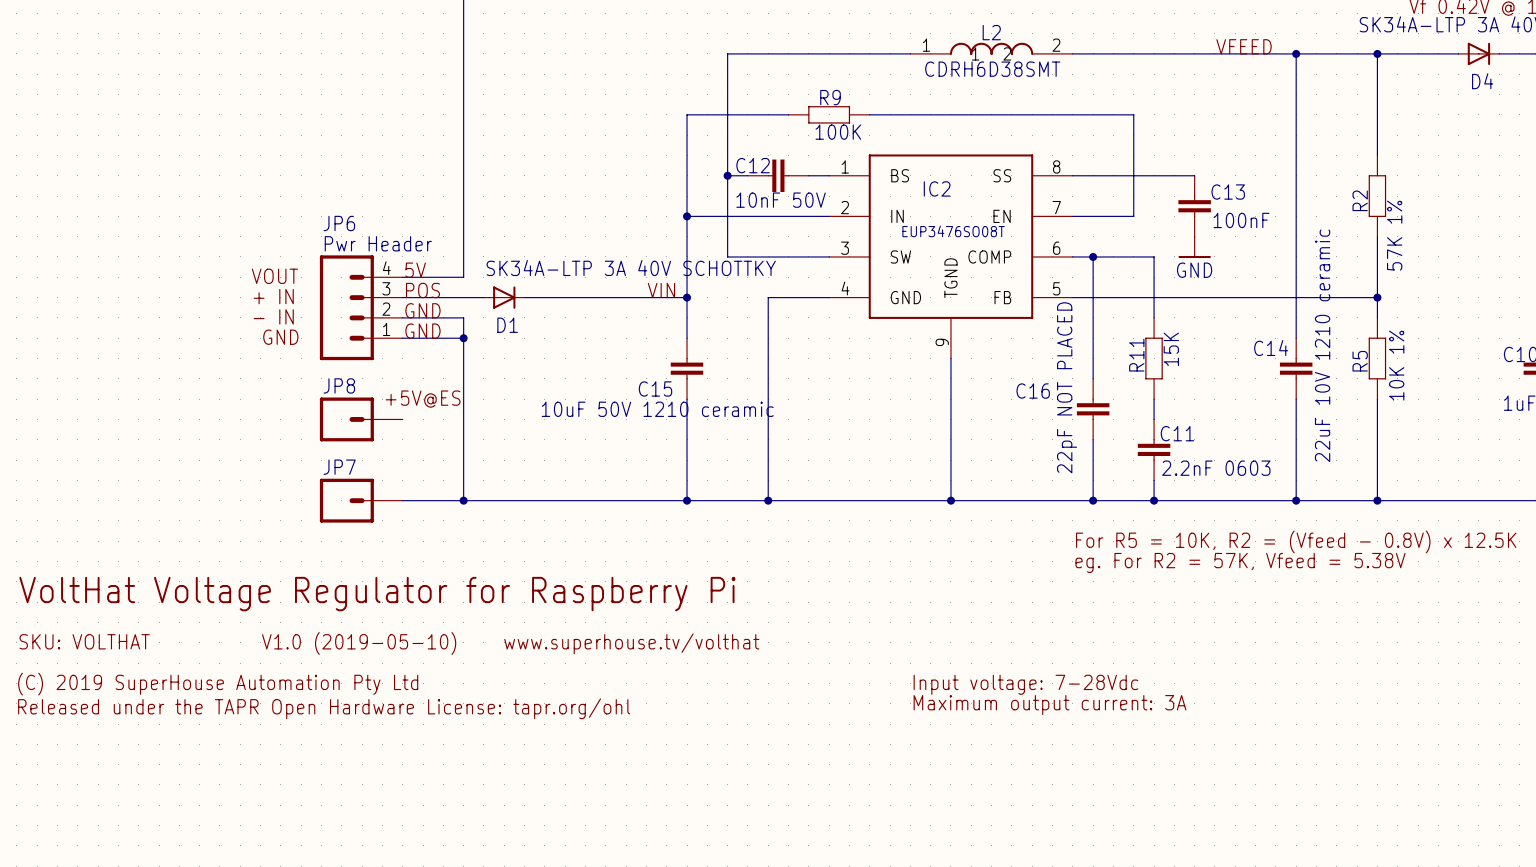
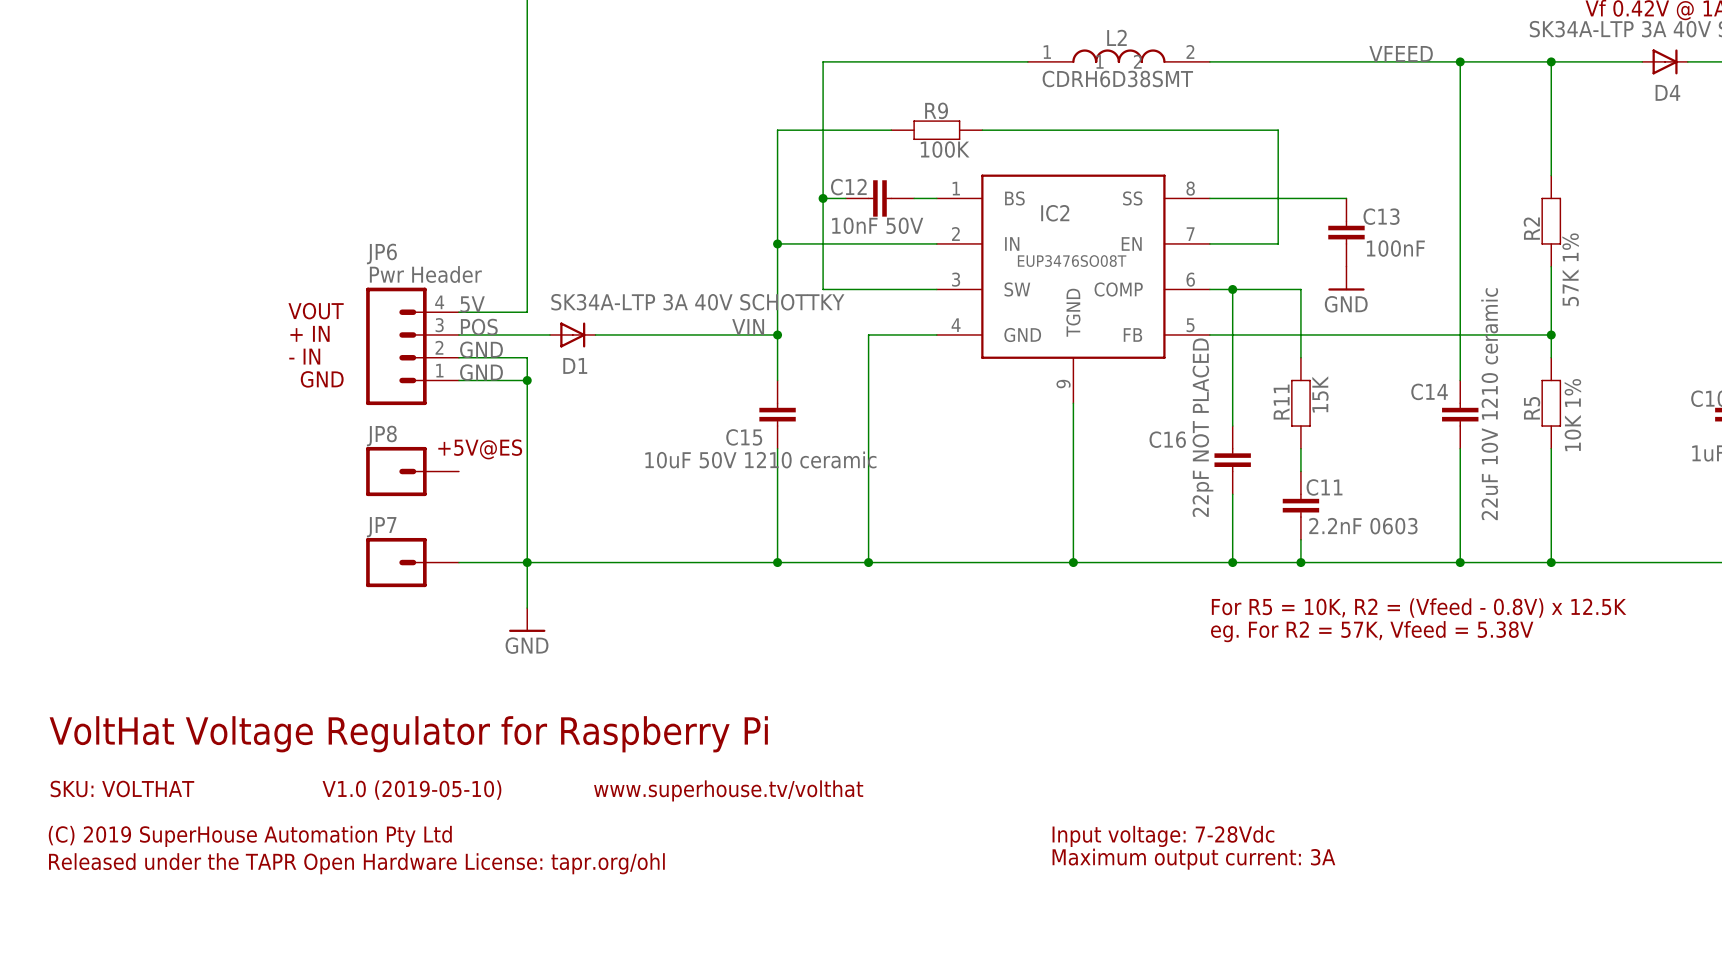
wire: none -> (527, 562) (527, 608)
power symbol: none -> GND (527, 620)
text position: VoltHat Voltage Regulator for Raspberry Pi (377, 594) -> VoltHat Voltage Regulator for Raspberry Pi (408, 734)
text position: SKU: VOLTHAT (84, 641) -> SKU: VOLTHAT (122, 788)
text position: V1.0 (2019-05-10) (359, 643) -> V1.0 (2019-05-10) (411, 790)
text position: www.superhouse.tv/volthat (631, 643) -> www.superhouse.tv/volthat (728, 790)
text position: (C) 2019 SuperHouse Automation Pty Ltd (218, 684) -> (C) 2019 SuperHouse Automation Pty Ltd (250, 836)
text position: Input voltage: 7-28Vdc (1025, 684) -> Input voltage: 7-28Vdc (1163, 836)
text position: Maximum output current: 3A (1050, 705) -> Maximum output current: 3A (1193, 859)
text position: Released under the TAPR Open Hardware License: tapr.org/ohl (324, 708) -> Released under the TAPR Open Hardware License: tapr.org/ohl (356, 863)

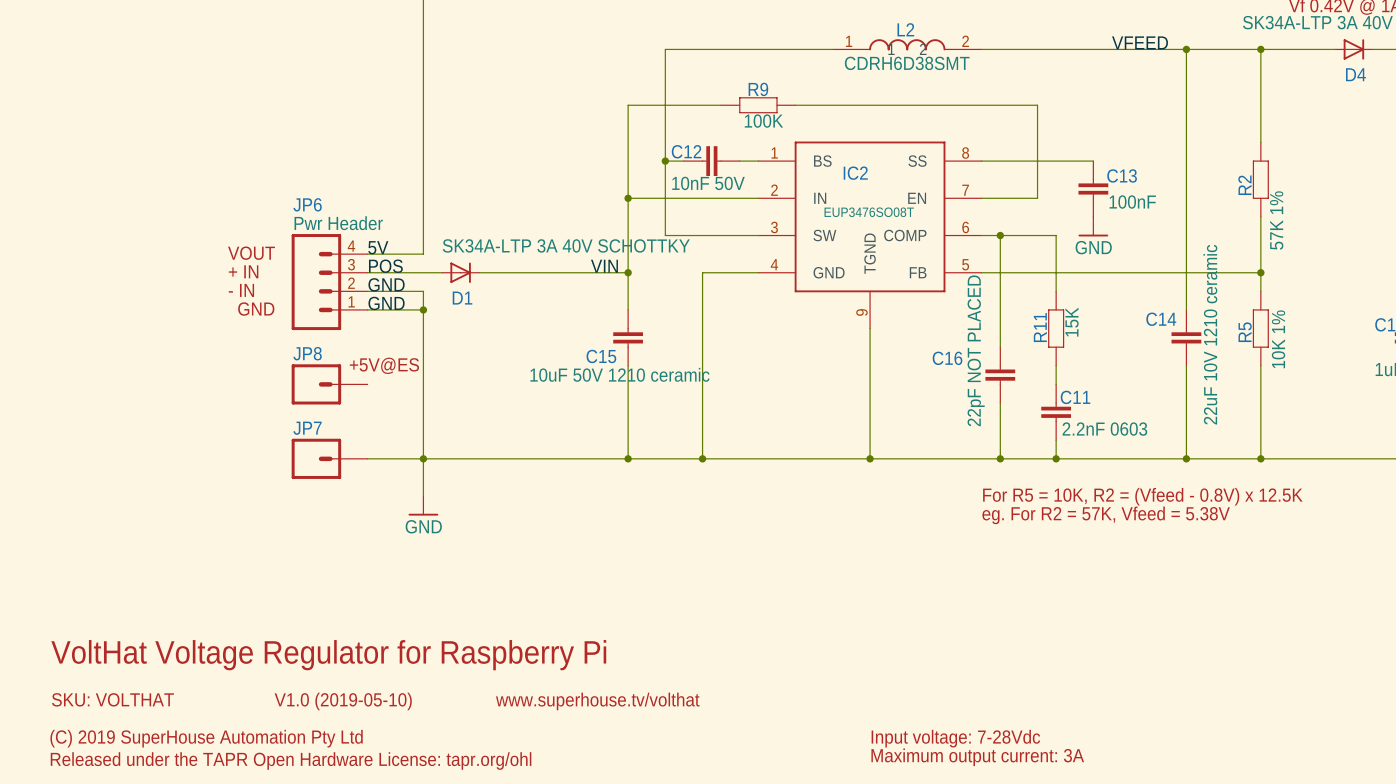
text position: VoltHat Voltage Regulator for Raspberry Pi (408, 734) -> VoltHat Voltage Regulator for Raspberry Pi (328, 655)
text position: SKU: VOLTHAT (122, 788) -> SKU: VOLTHAT (112, 699)
text position: V1.0 (2019-05-10) (411, 790) -> V1.0 (2019-05-10) (343, 701)
text position: www.superhouse.tv/volthat (728, 790) -> www.superhouse.tv/volthat (597, 701)
text position: (C) 2019 SuperHouse Automation Pty Ltd (250, 836) -> (C) 2019 SuperHouse Automation Pty Ltd (206, 738)
text position: Input voltage: 7-28Vdc (1163, 836) -> Input voltage: 7-28Vdc (955, 738)
text position: Maximum output current: 3A (1193, 859) -> Maximum output current: 3A (977, 757)
text position: Released under the TAPR Open Hardware License: tapr.org/ohl (356, 863) -> Released under the TAPR Open Hardware License: tapr.org/ohl (291, 761)

